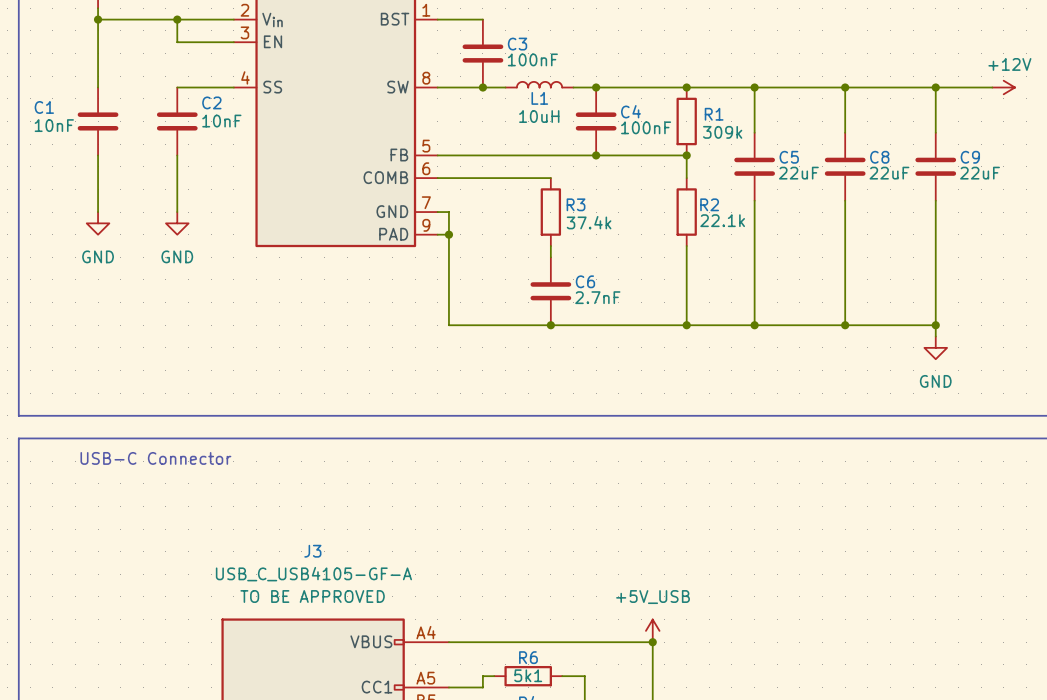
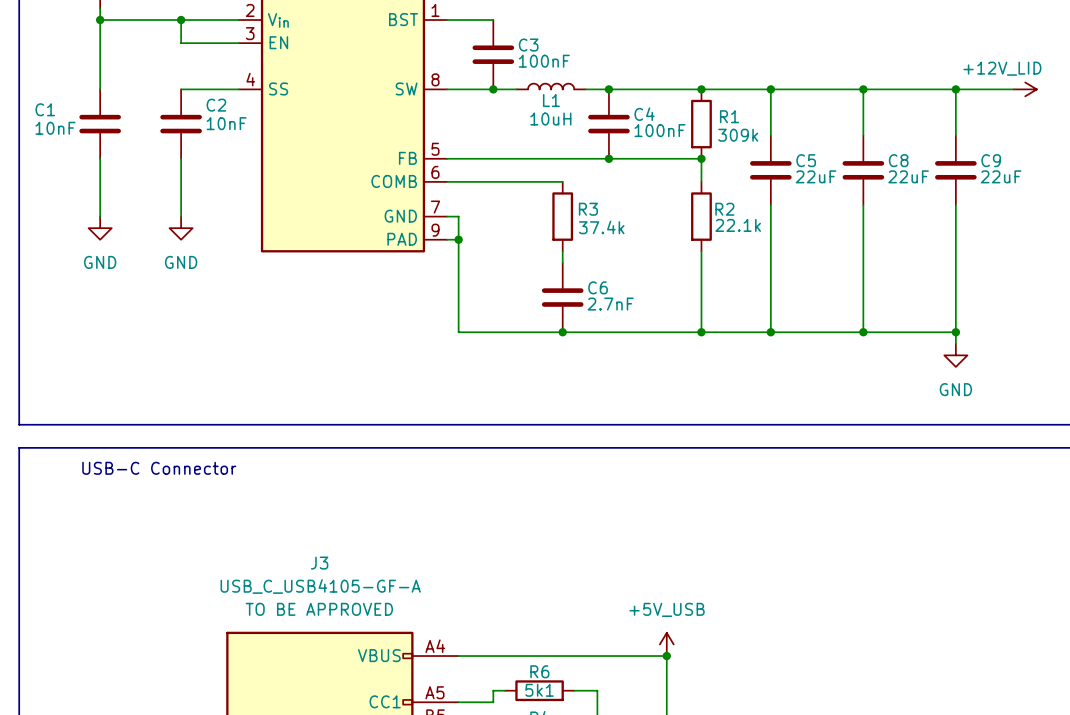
power symbol: +12V (1003, 87) -> +12V_LID (1025, 89)

